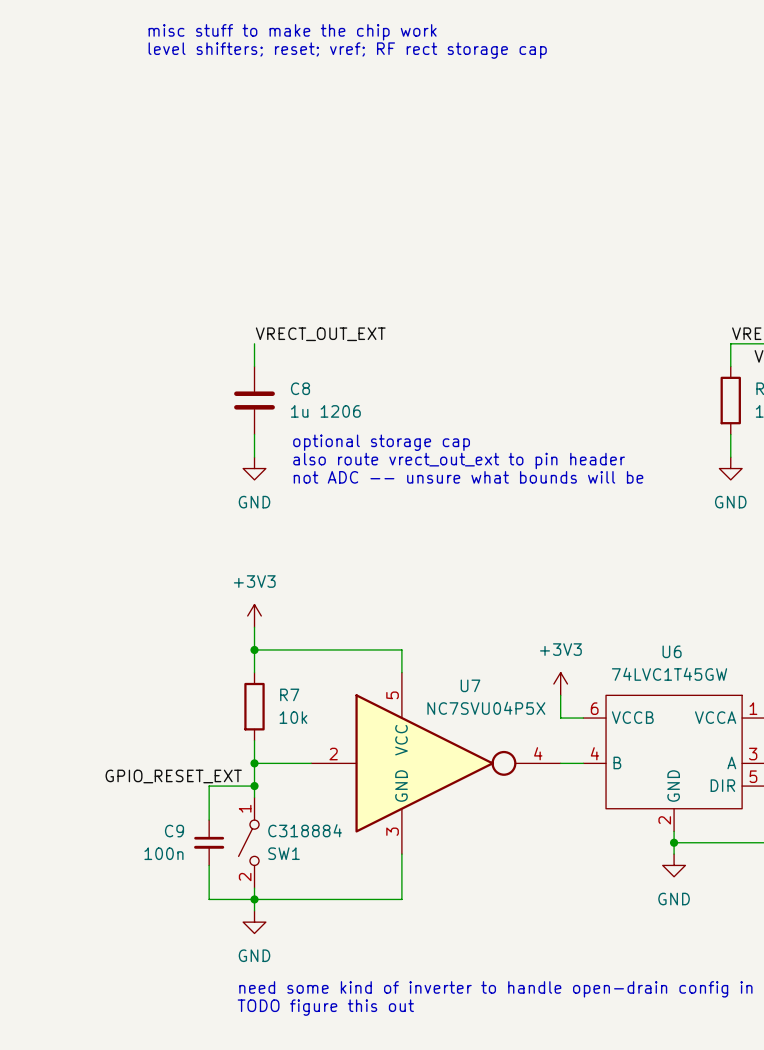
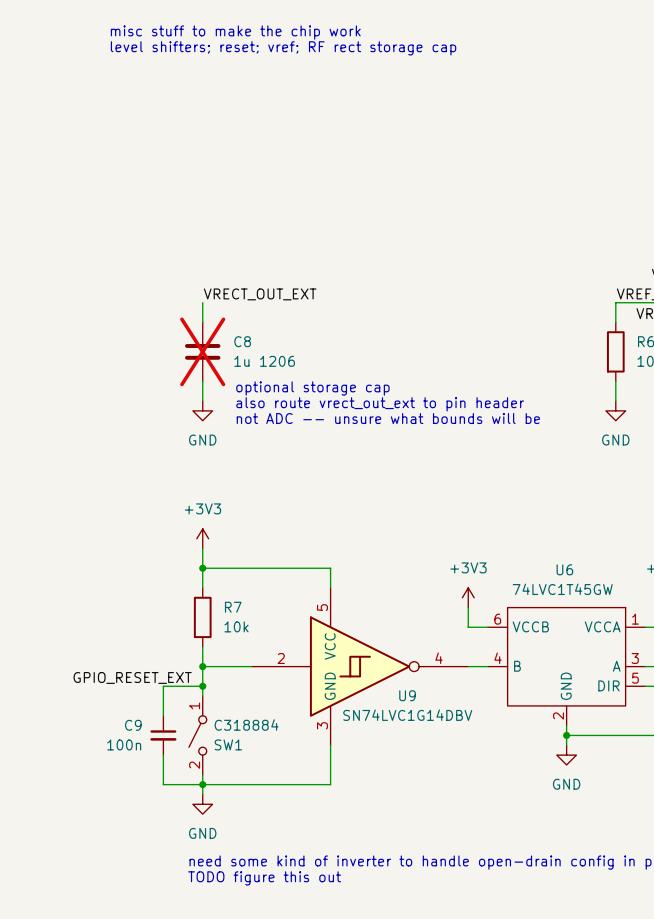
C8 do-not-place cross: none -> (202, 351)
U7: NC7SVU04P5X (435, 763) -> none
U9: none -> SN74LVC1G14DBV (360, 666)

